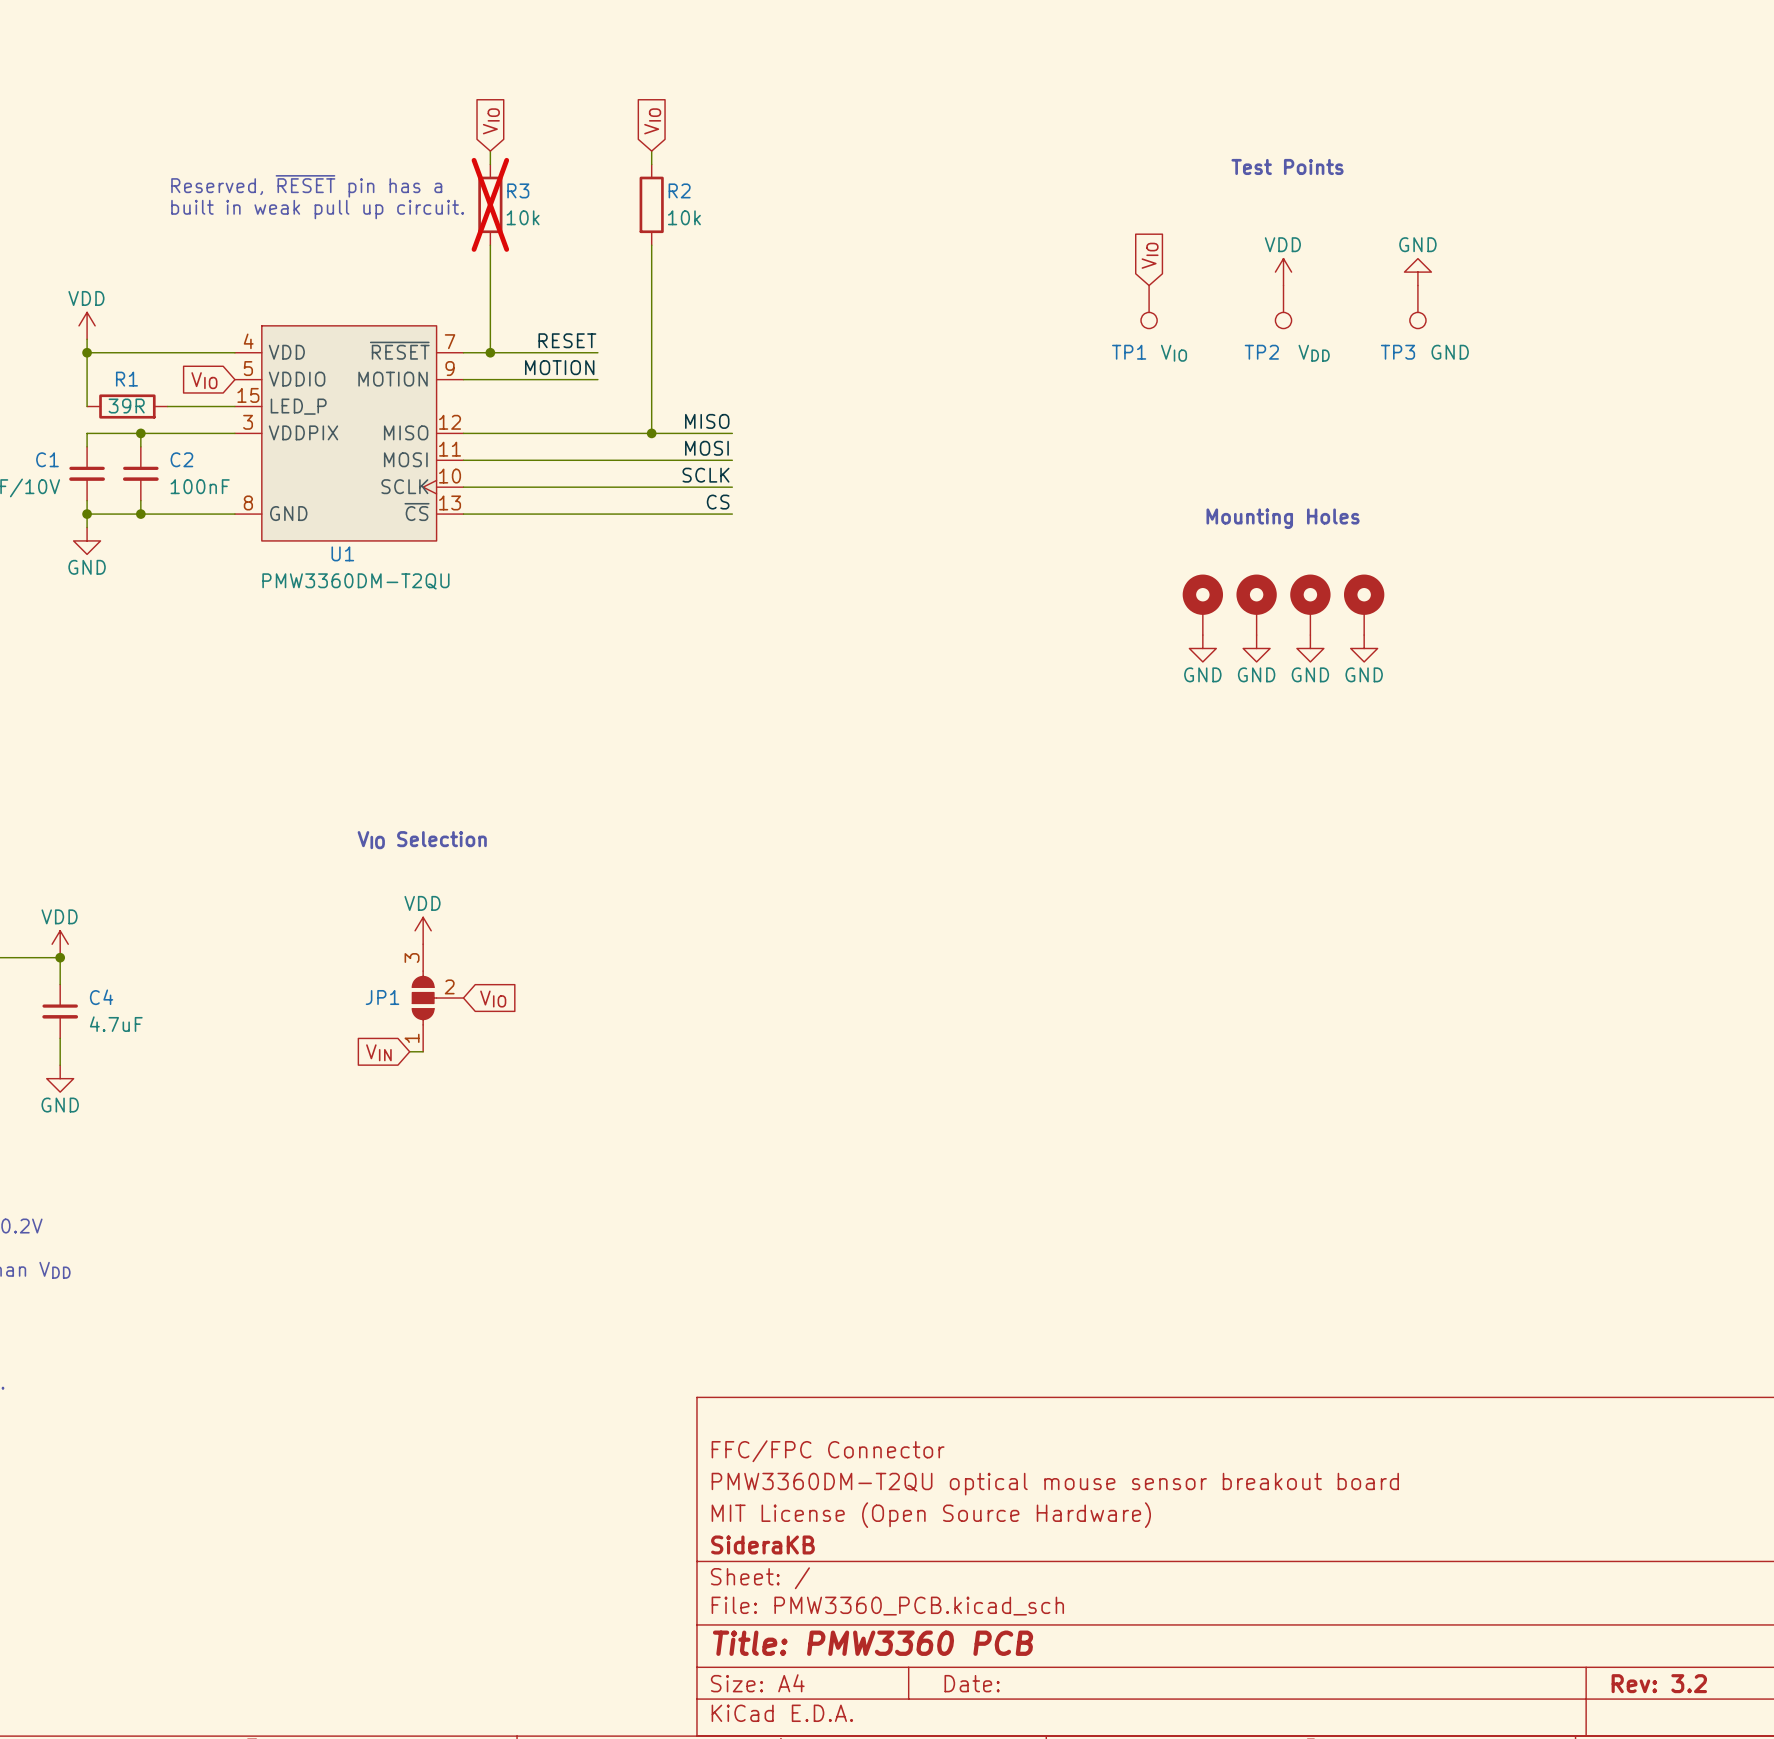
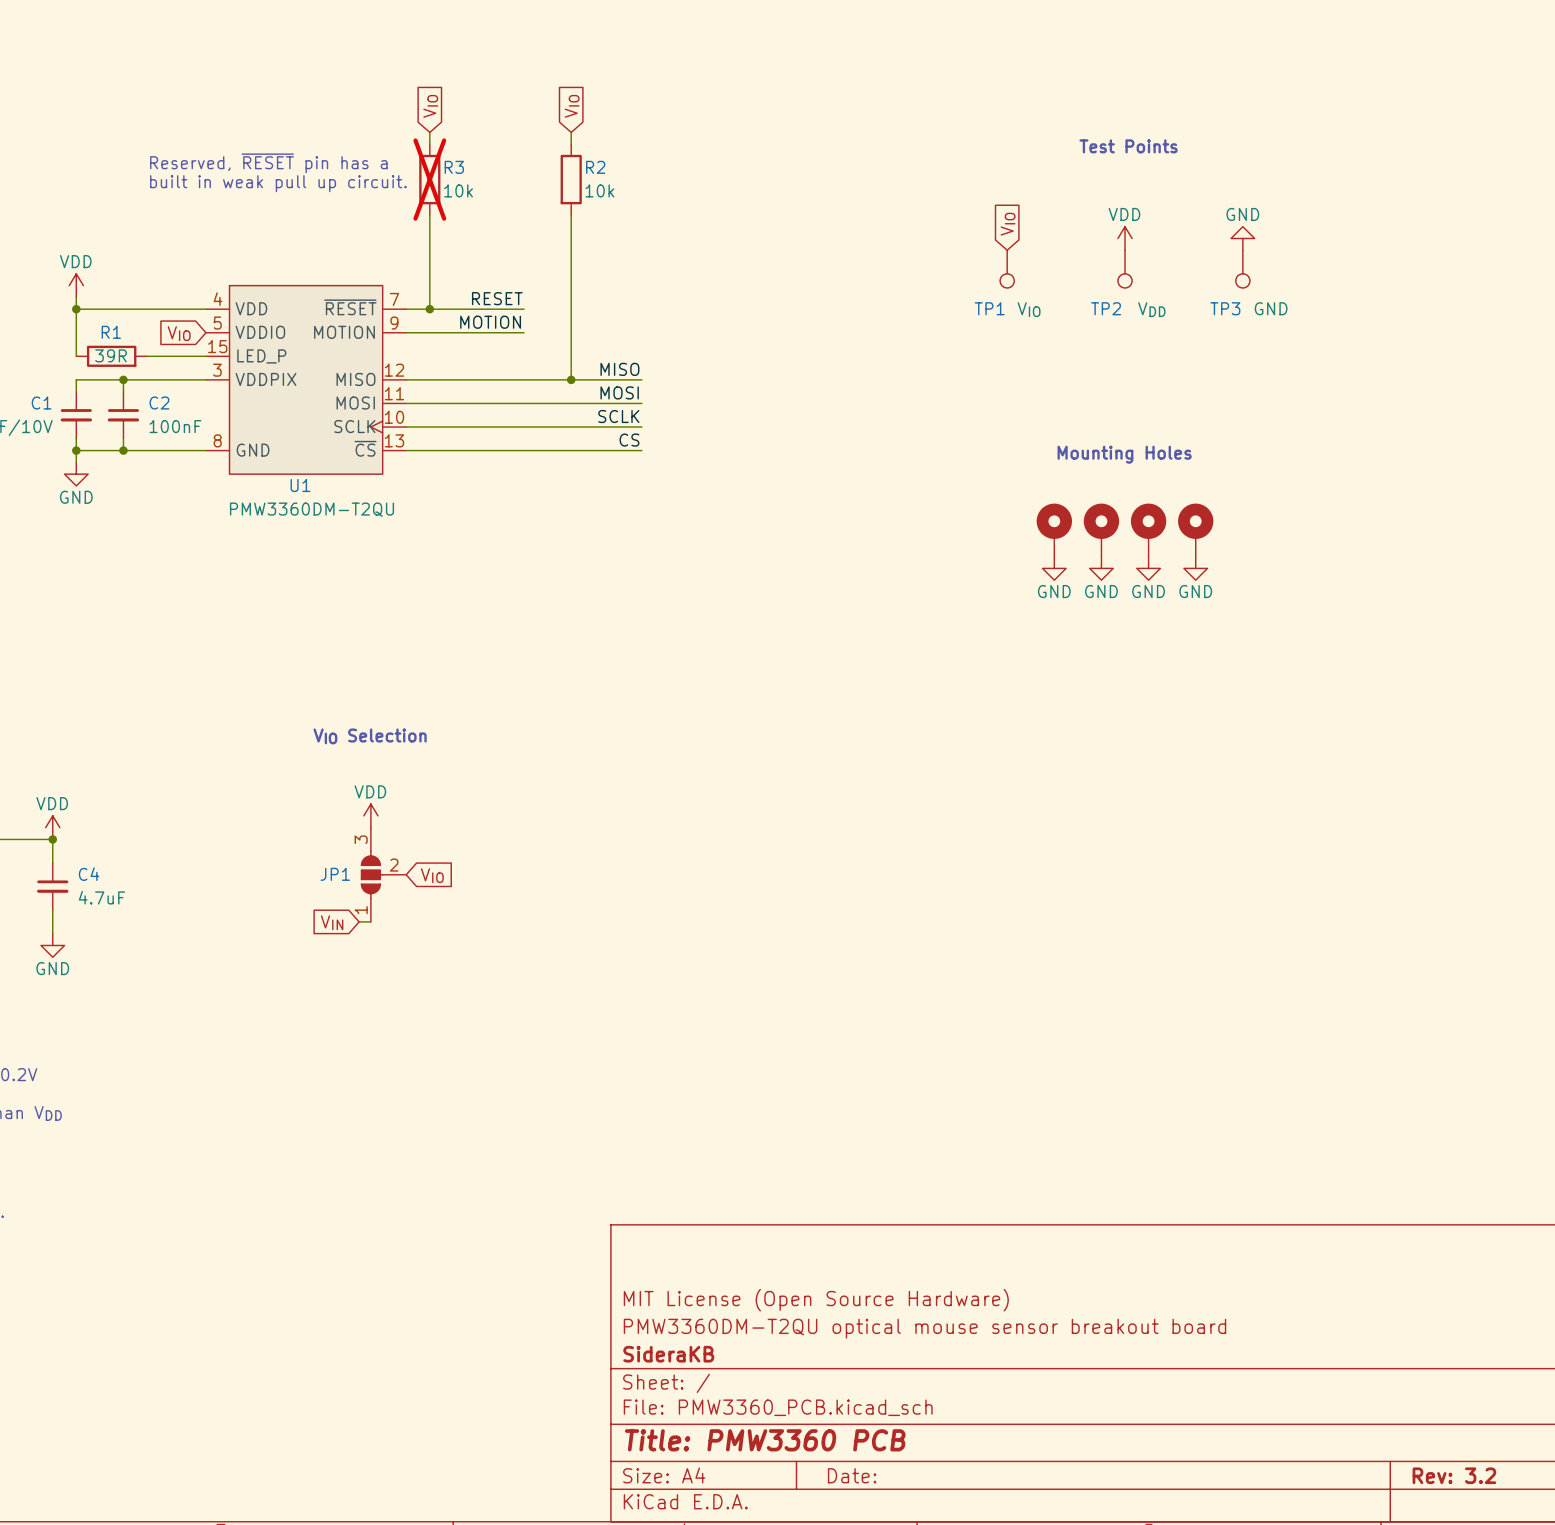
title block: FFC/FPC Connector (828, 1451) -> none
title block: PMW3360DM-T2QU optical mouse sensor breakout board (1055, 1484) -> MIT License (Open Source Hardware) (816, 1300)
title block: MIT License (Open Source Hardware) (931, 1515) -> PMW3360DM-T2QU optical mouse sensor breakout board (924, 1328)

